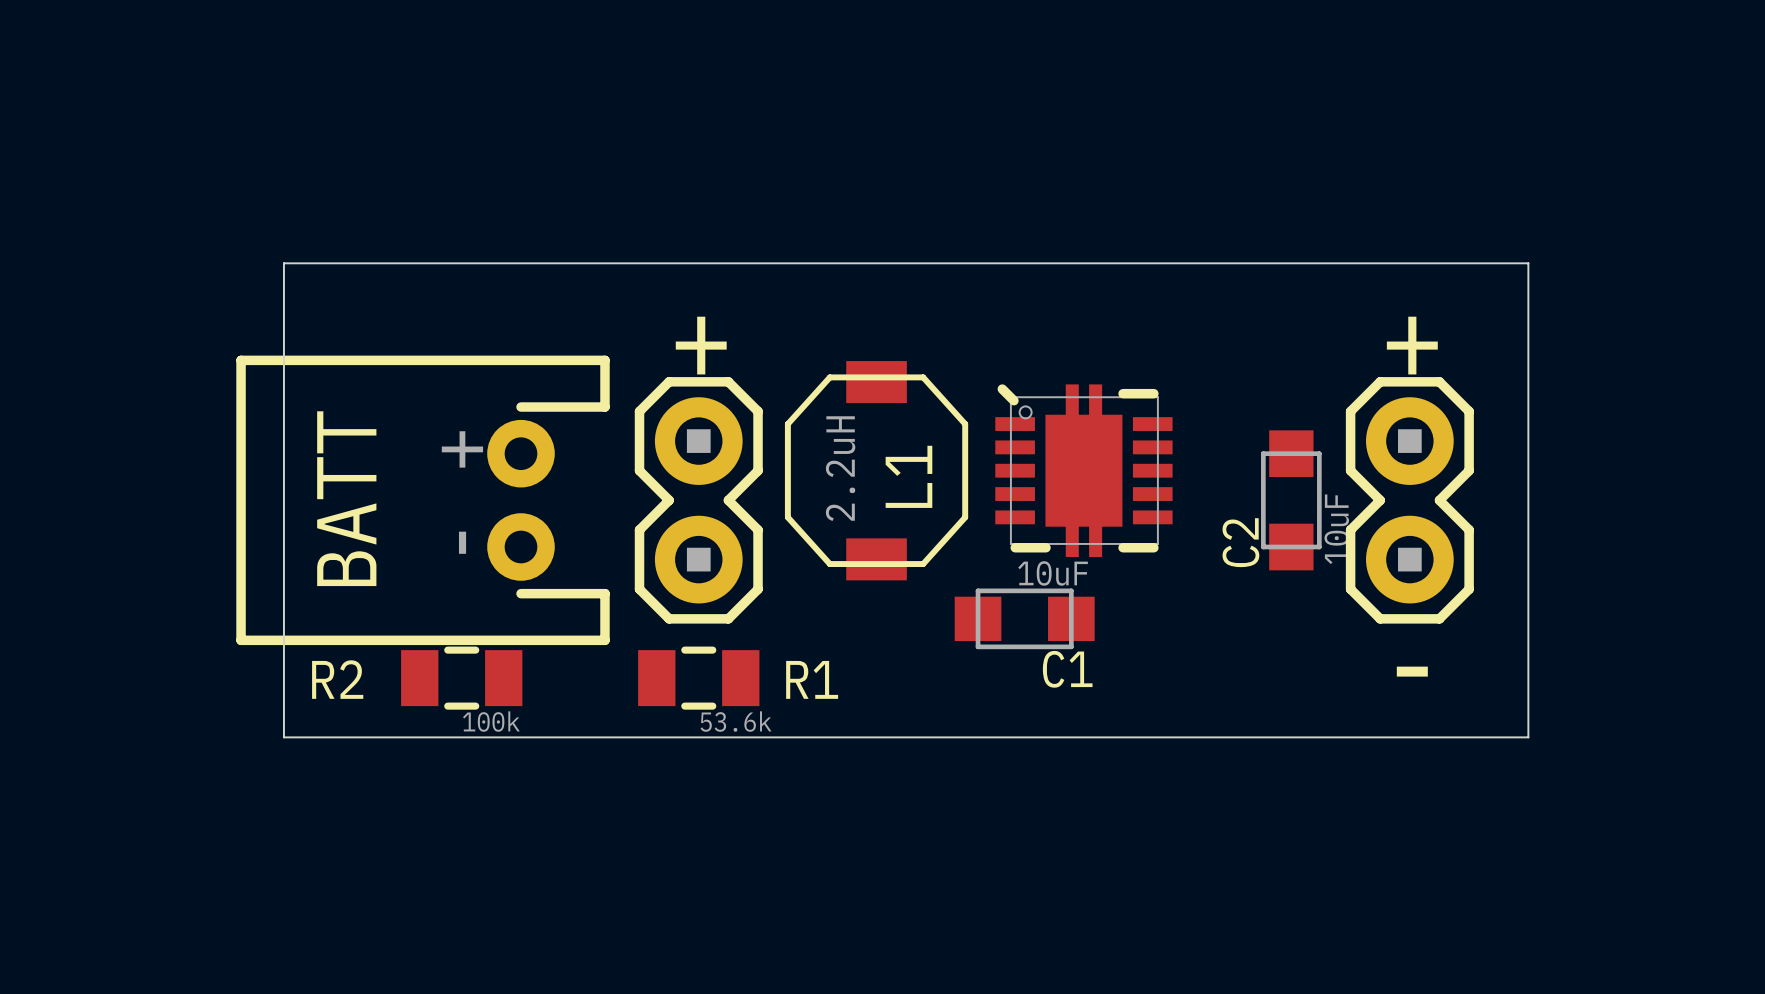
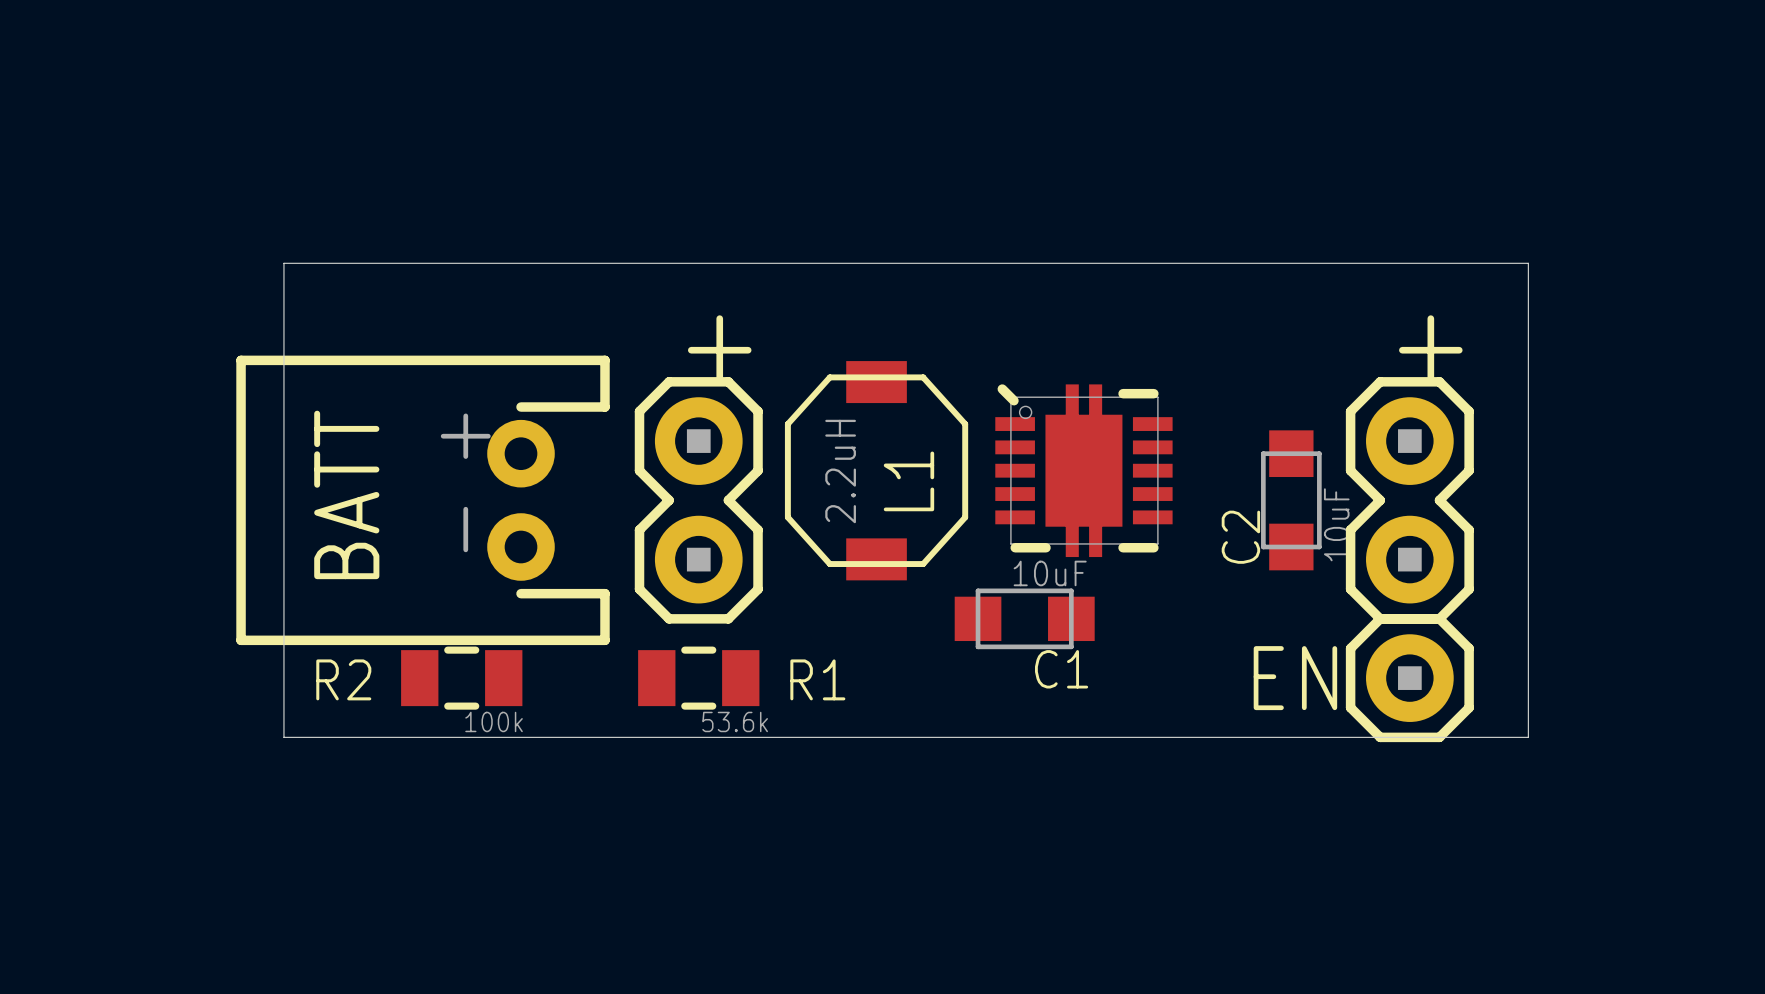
text: - (1412, 671) -> none
text: none -> EN (1295, 678)
part: none -> (1409, 678)

